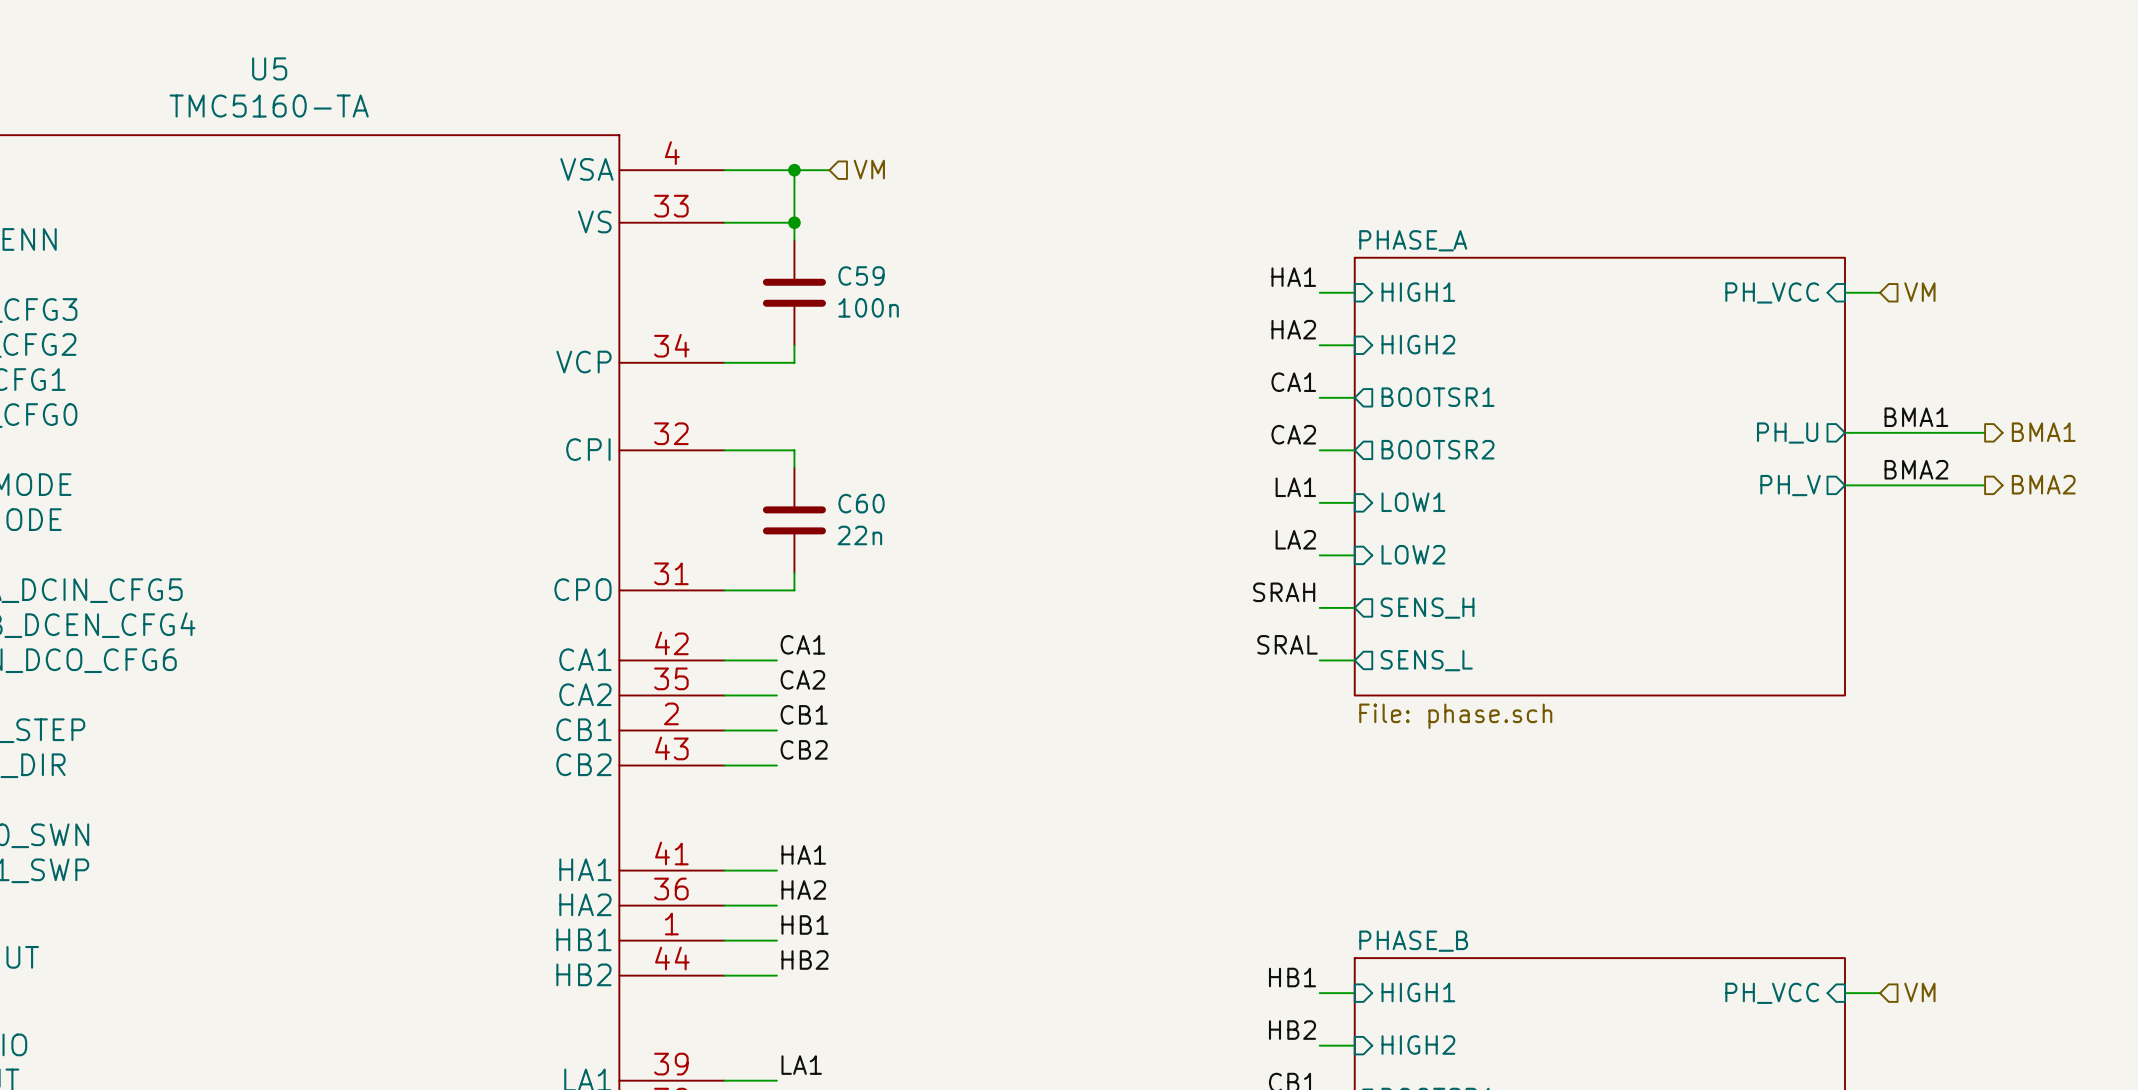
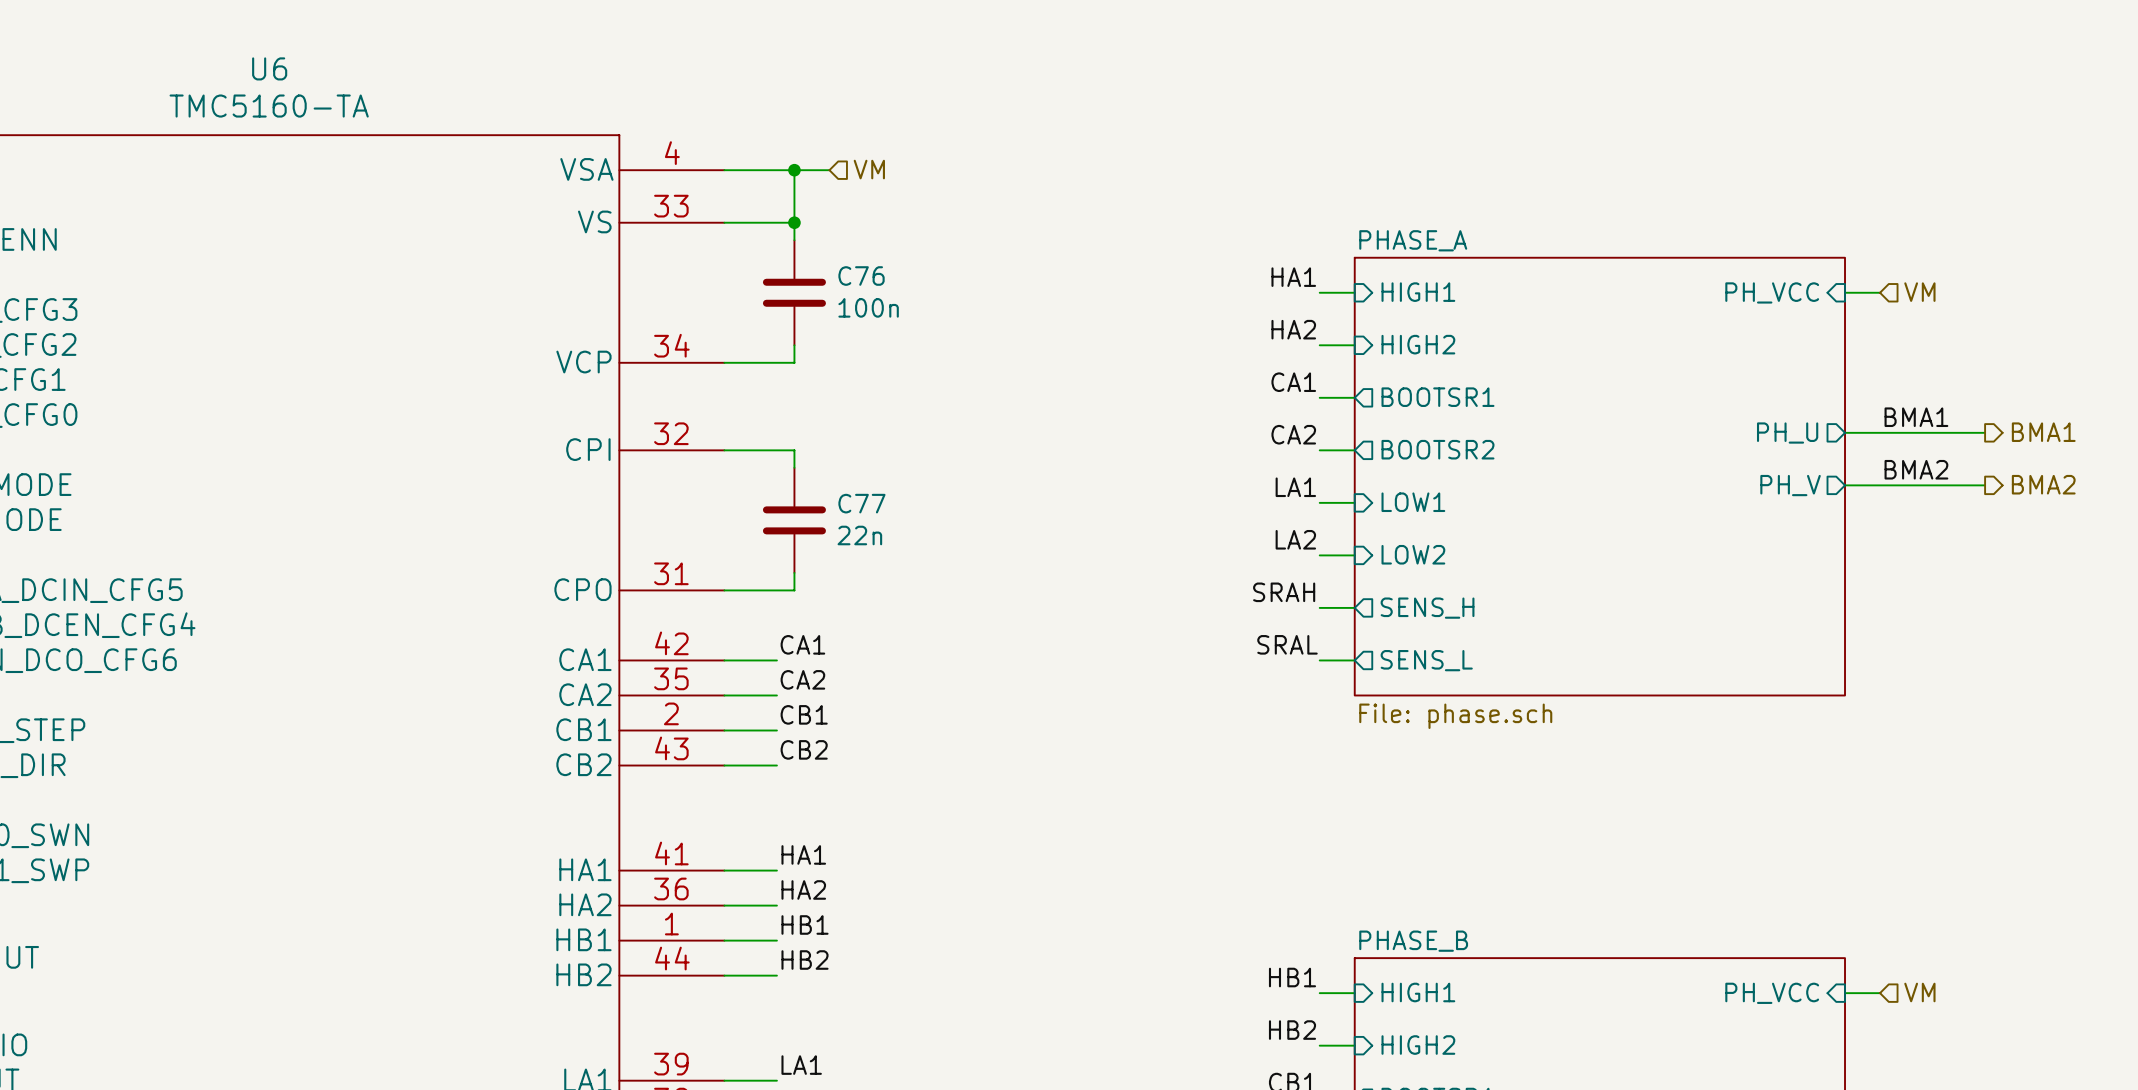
U5 name: U5 (269, 68) -> U6 (269, 68)
C59 name: C59 (861, 276) -> C76 (861, 276)
C60 name: C60 (861, 503) -> C77 (861, 503)

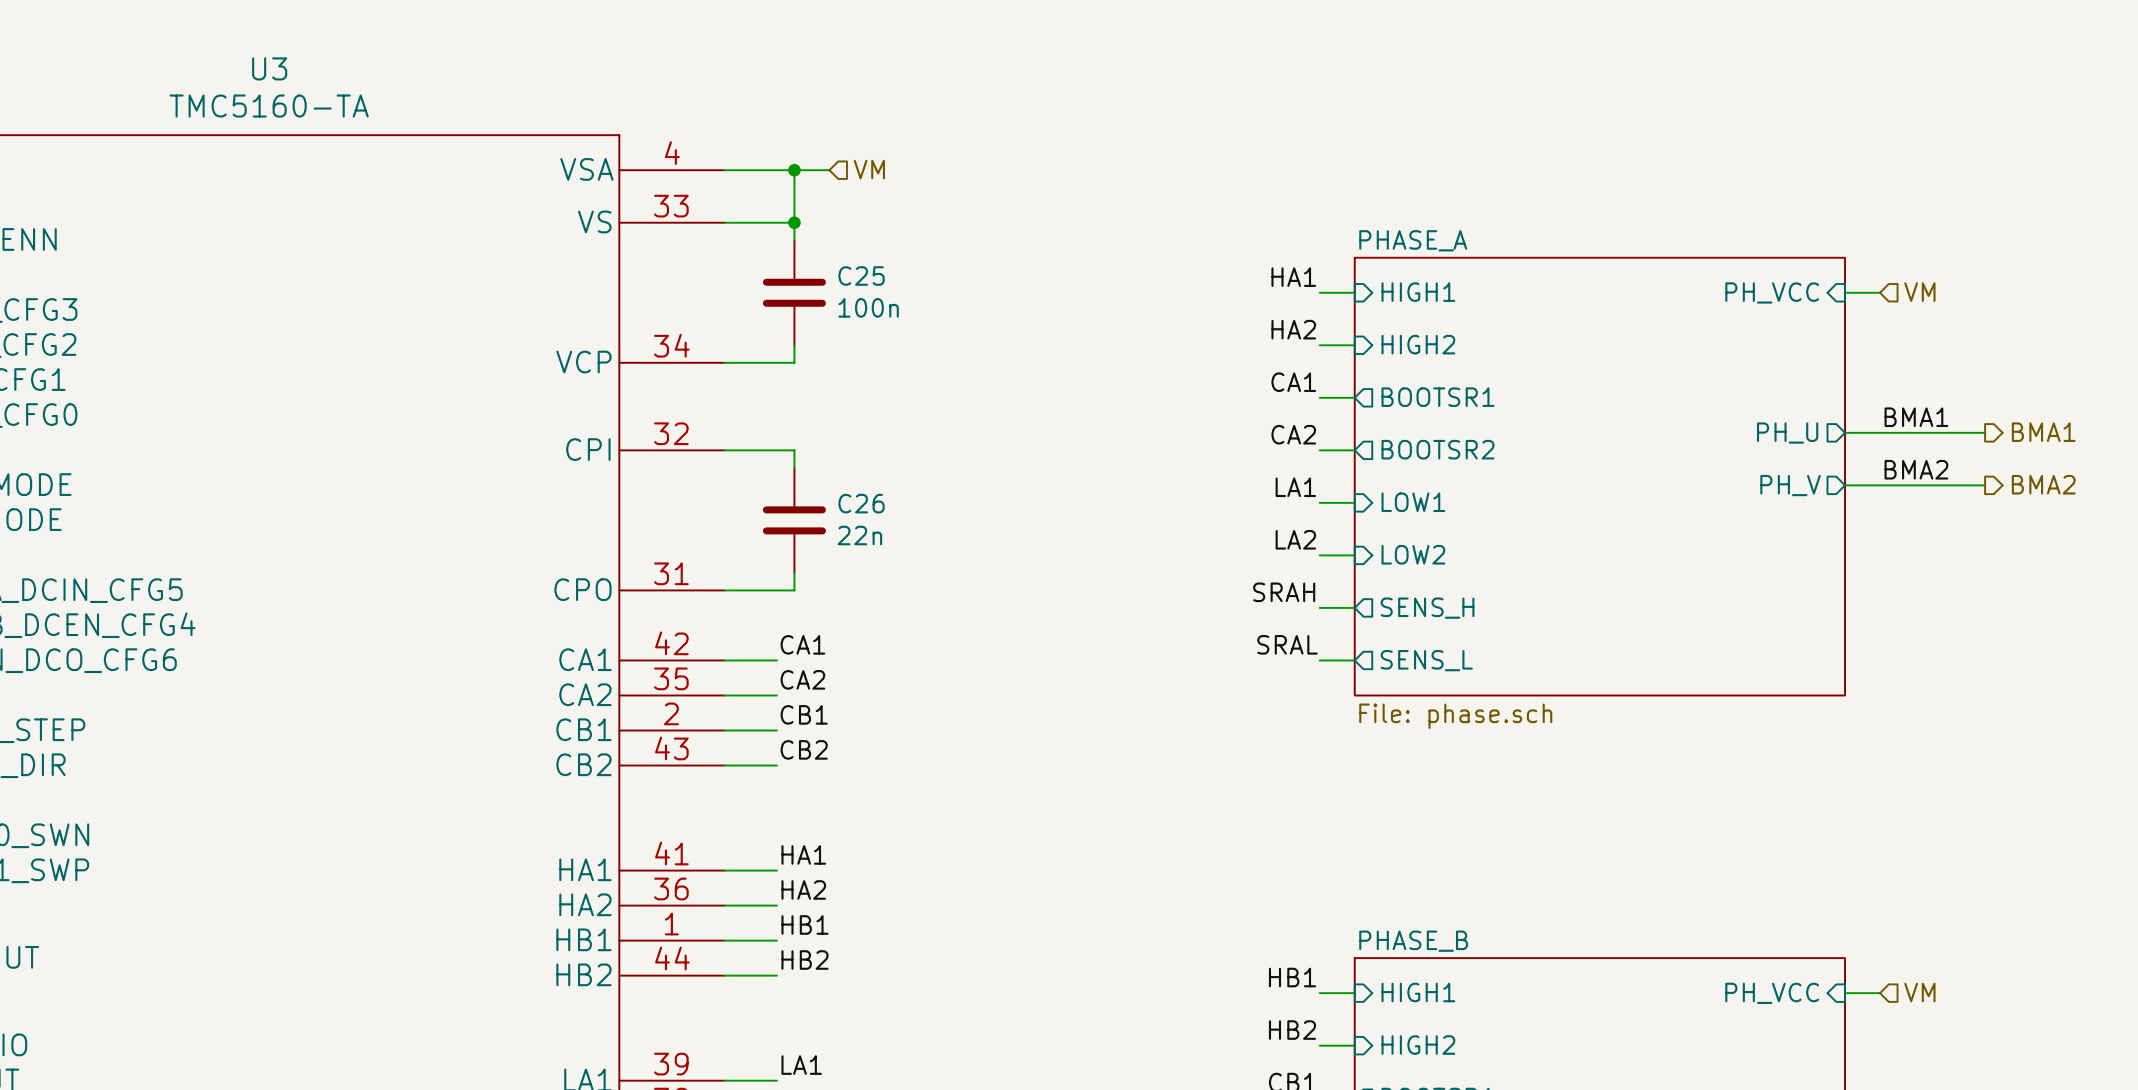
U6 name: U6 (269, 68) -> U3 (269, 68)
C76 name: C76 (861, 276) -> C25 (861, 276)
C77 name: C77 (861, 503) -> C26 (861, 503)

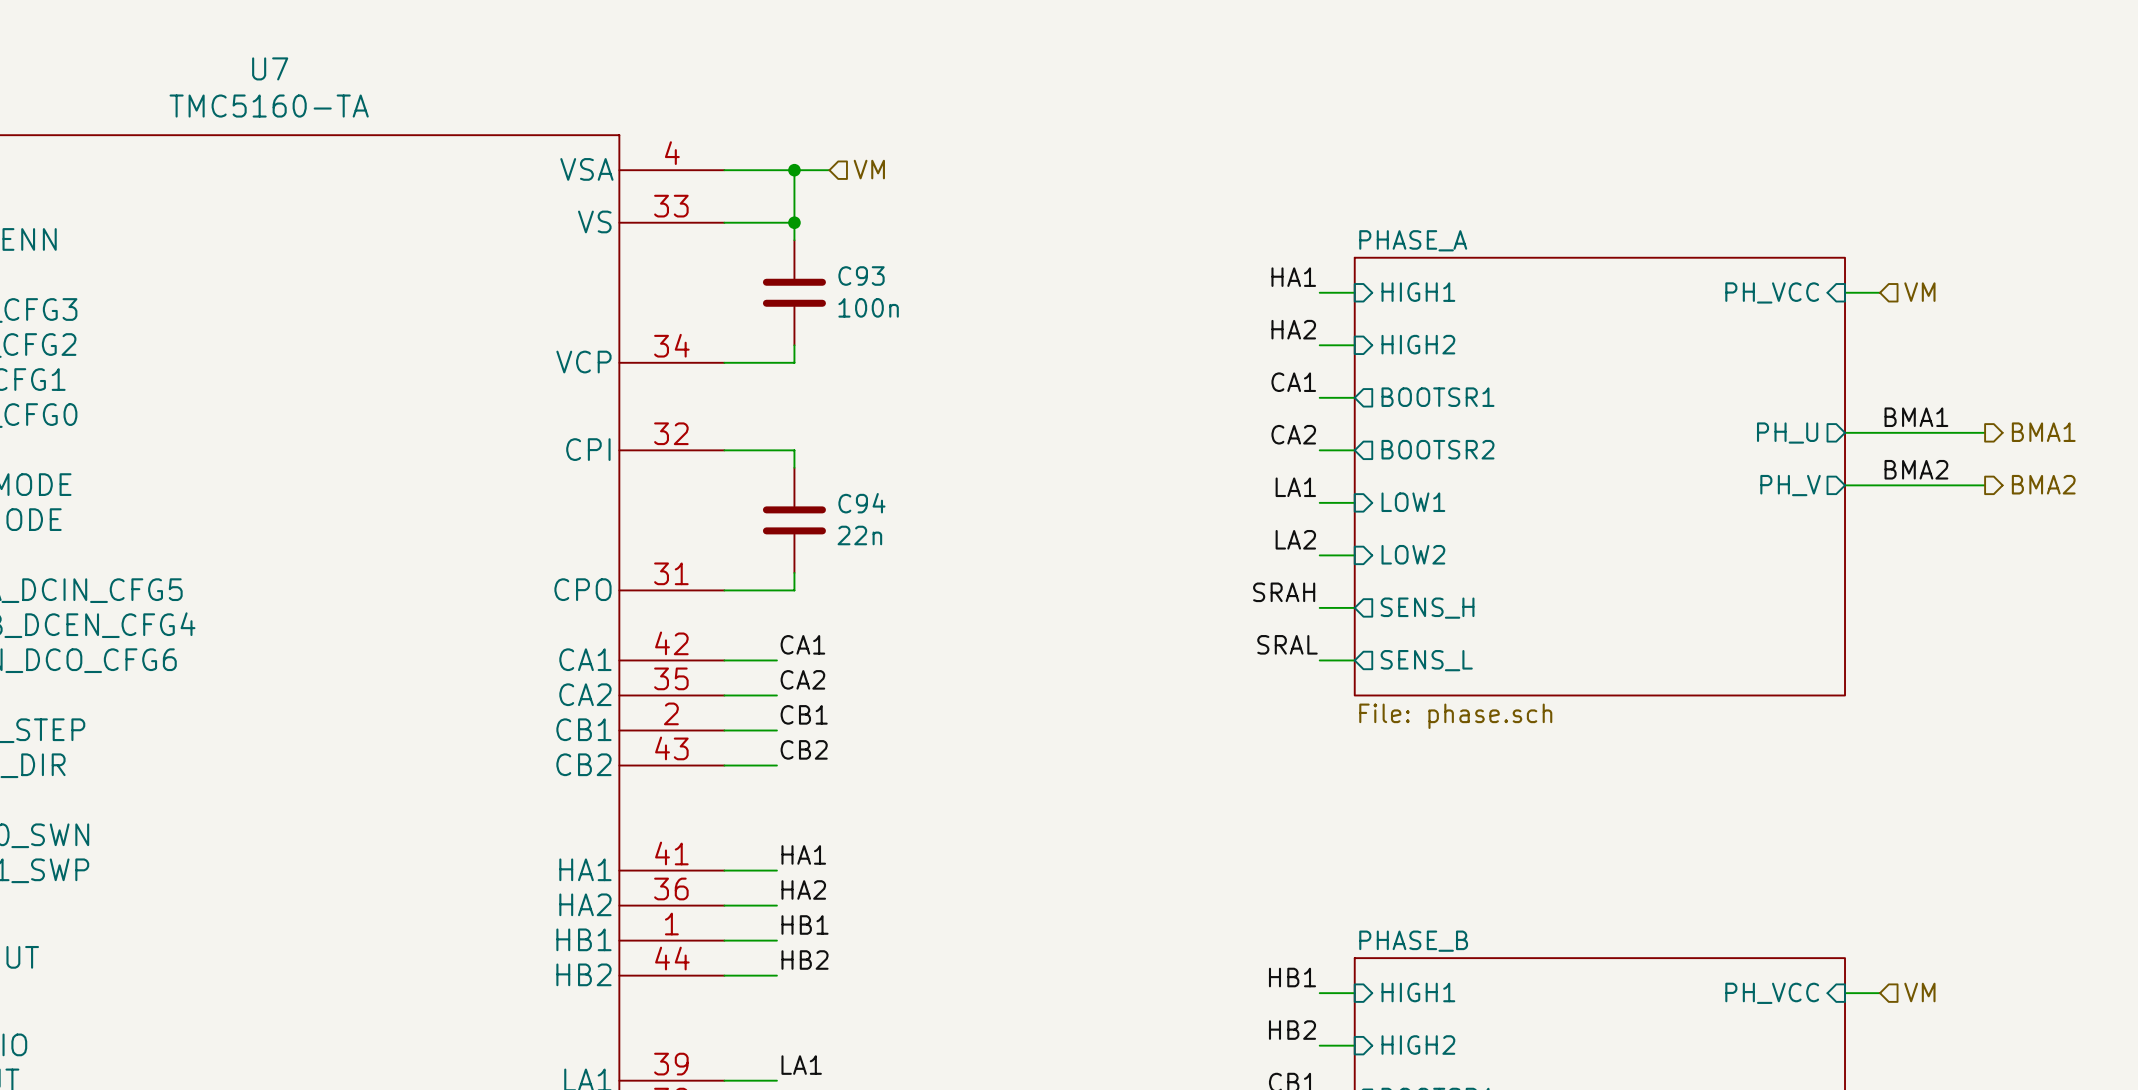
U3 name: U3 (269, 68) -> U7 (270, 68)
C25 name: C25 (861, 276) -> C93 (861, 276)
C26 name: C26 (861, 503) -> C94 (861, 503)

